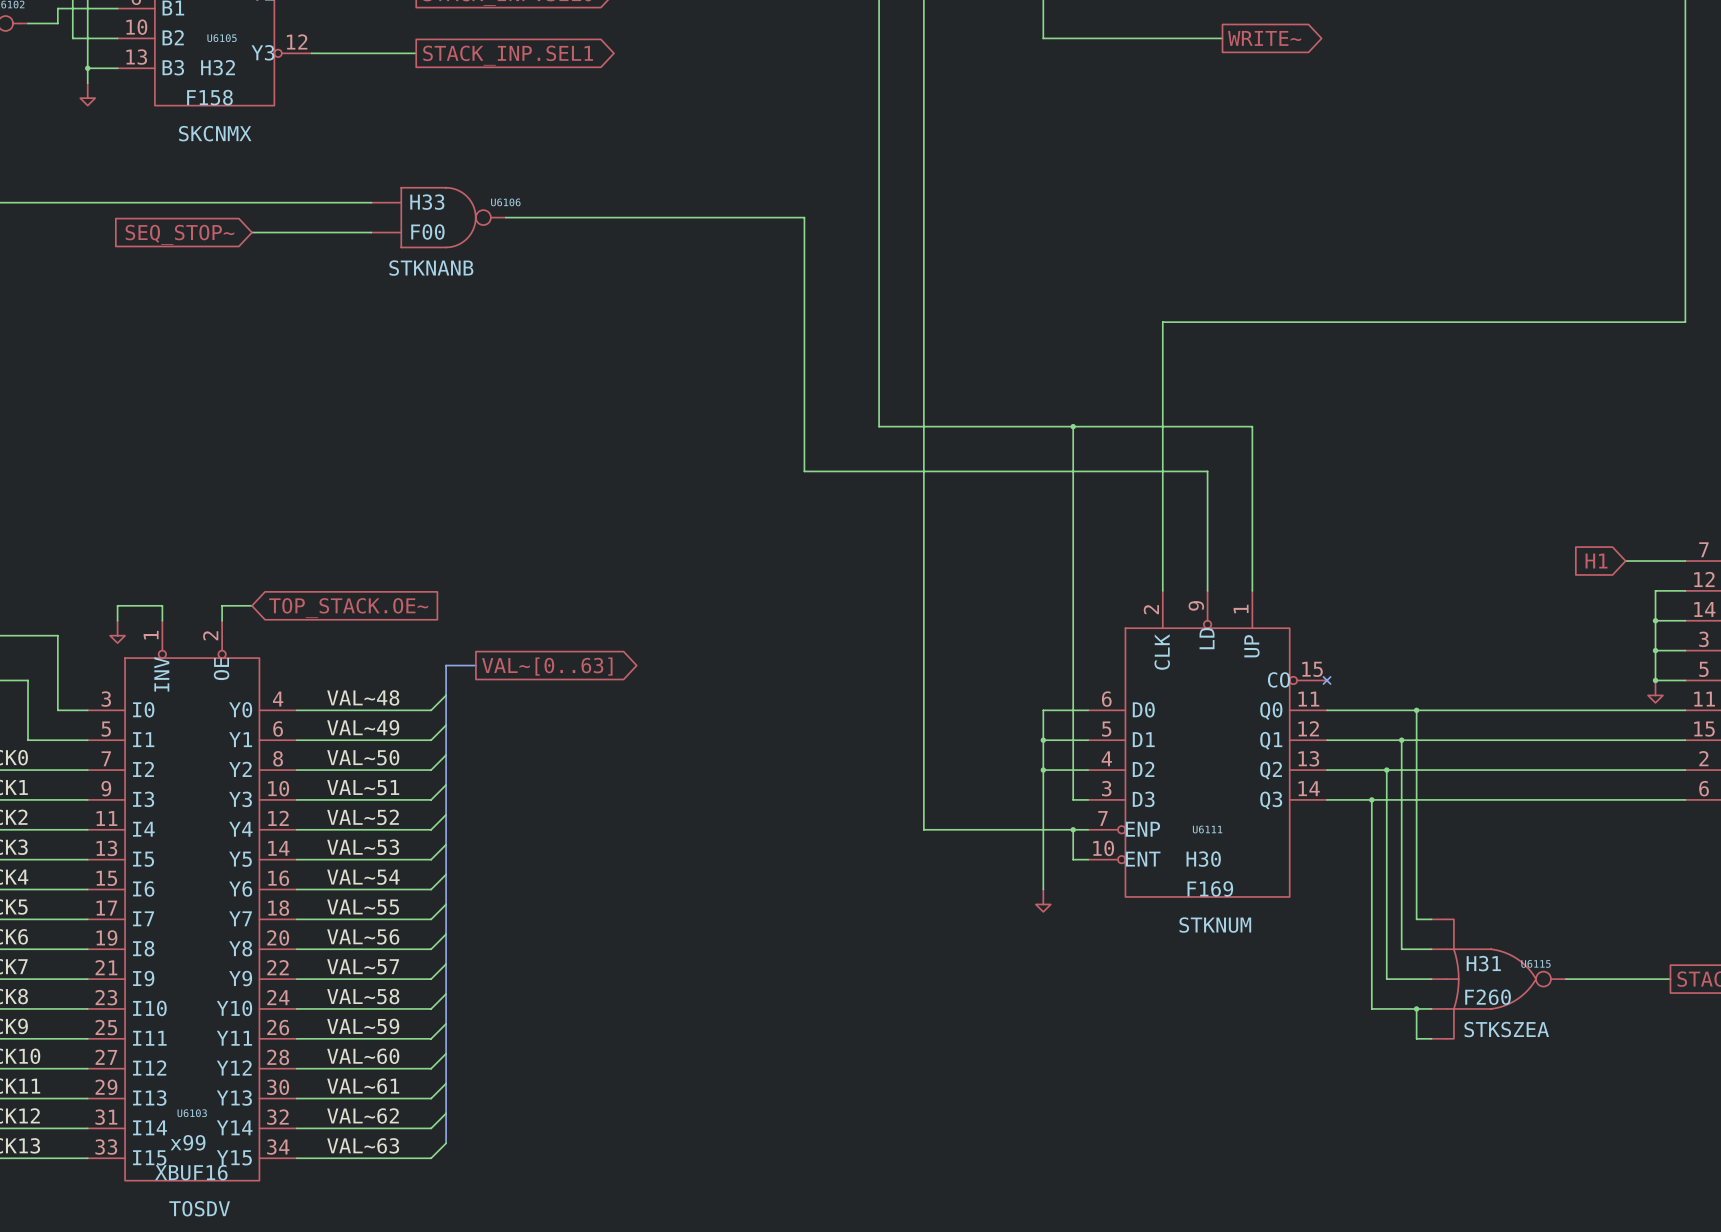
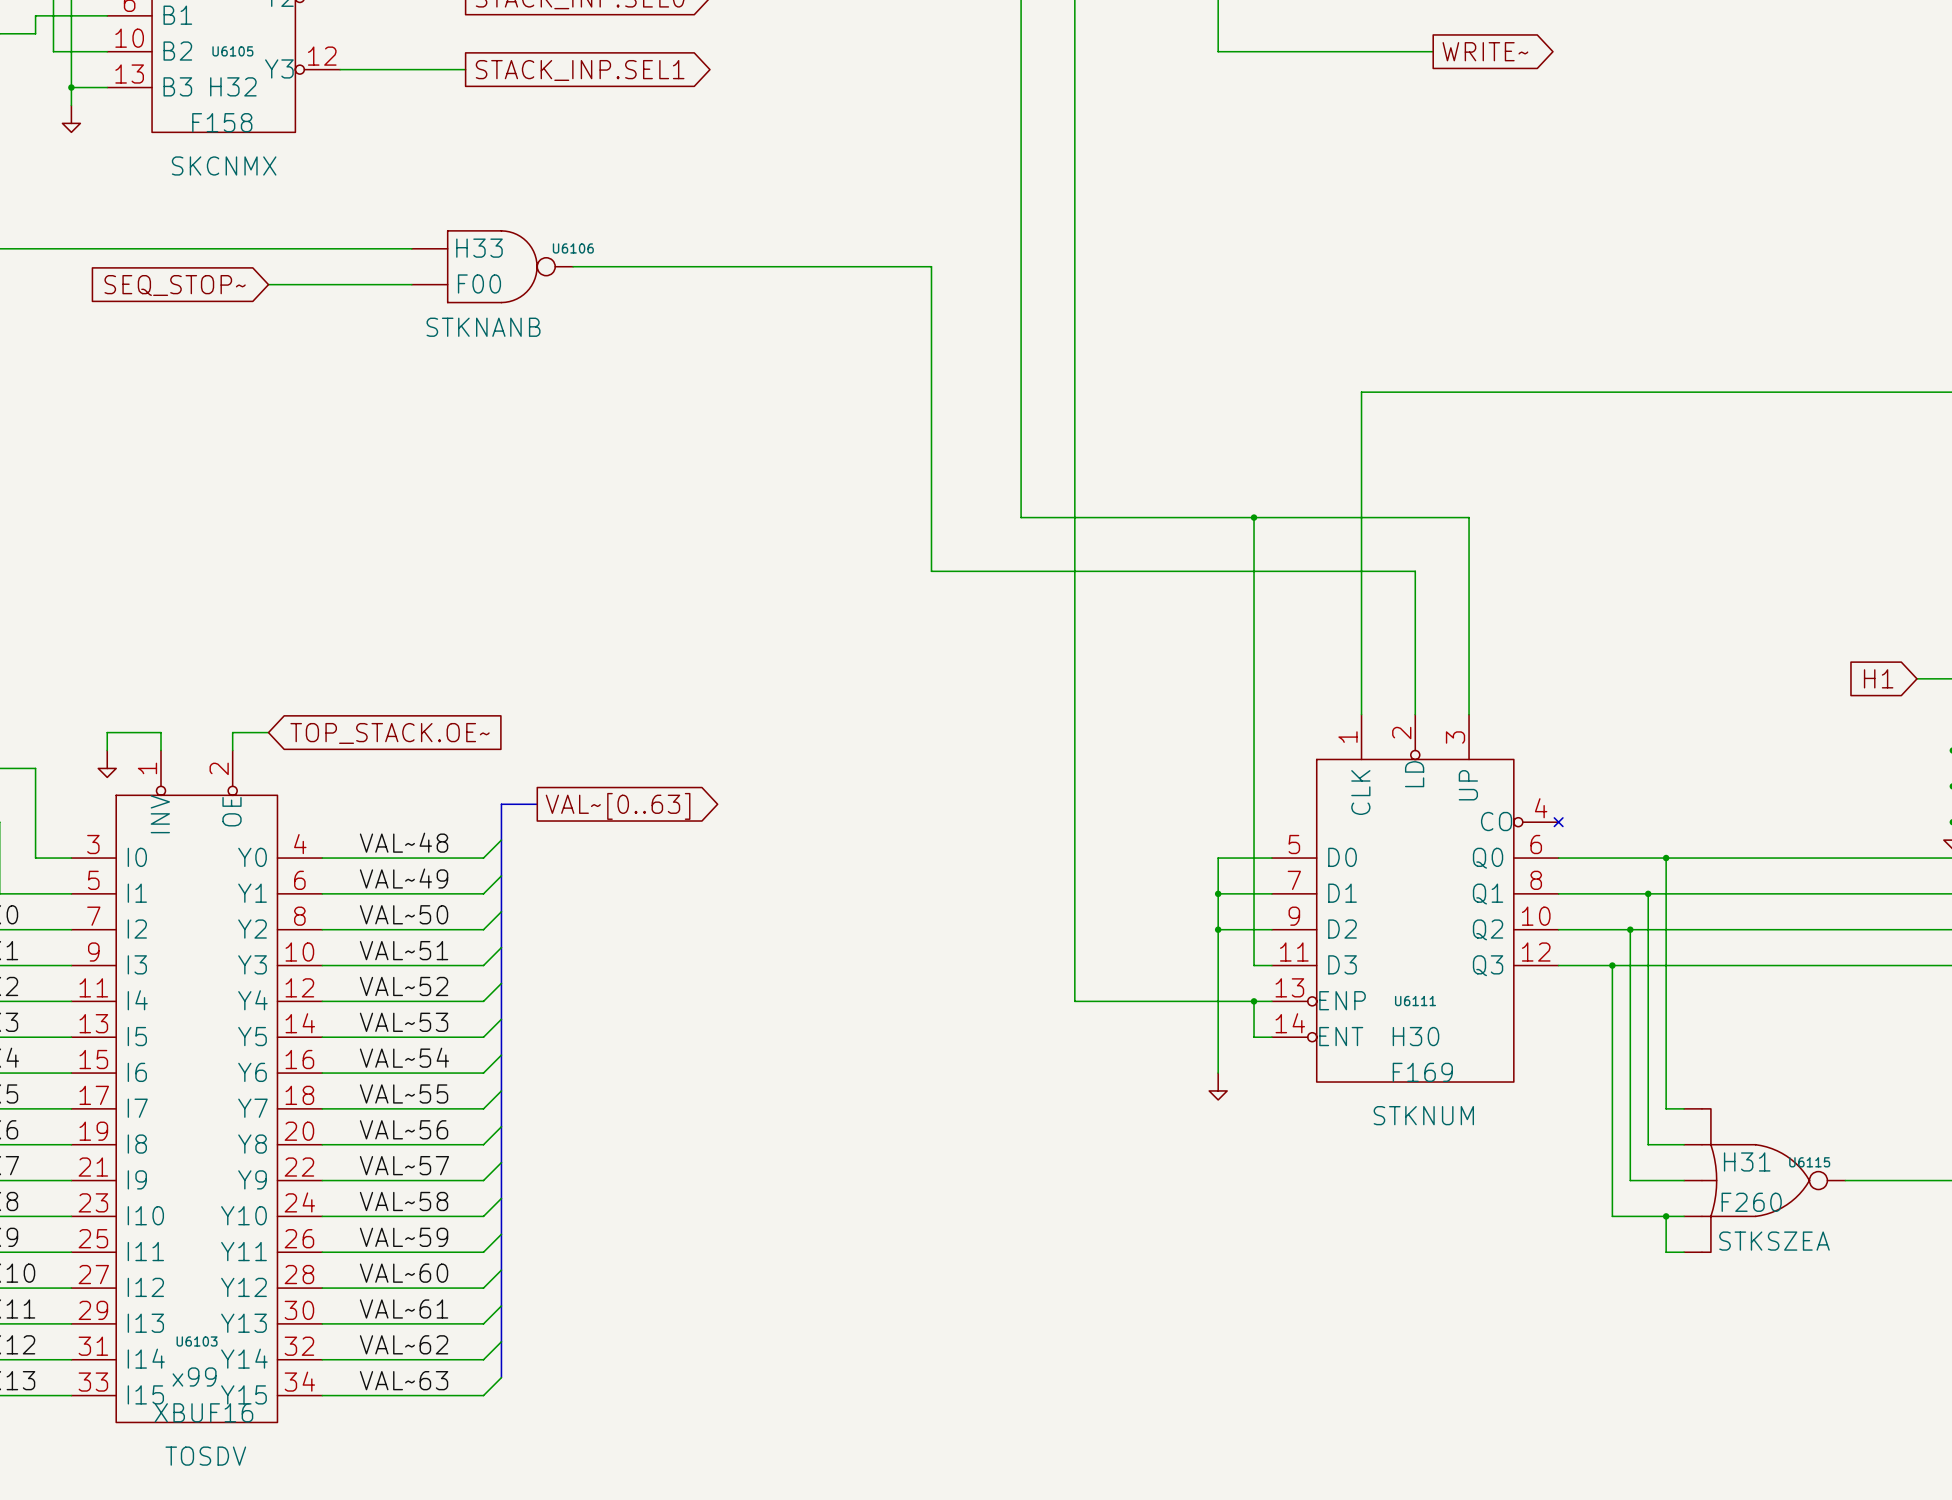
U6111 symbol: [1088, 590, 1328, 897] -> [1271, 714, 1559, 1083]

